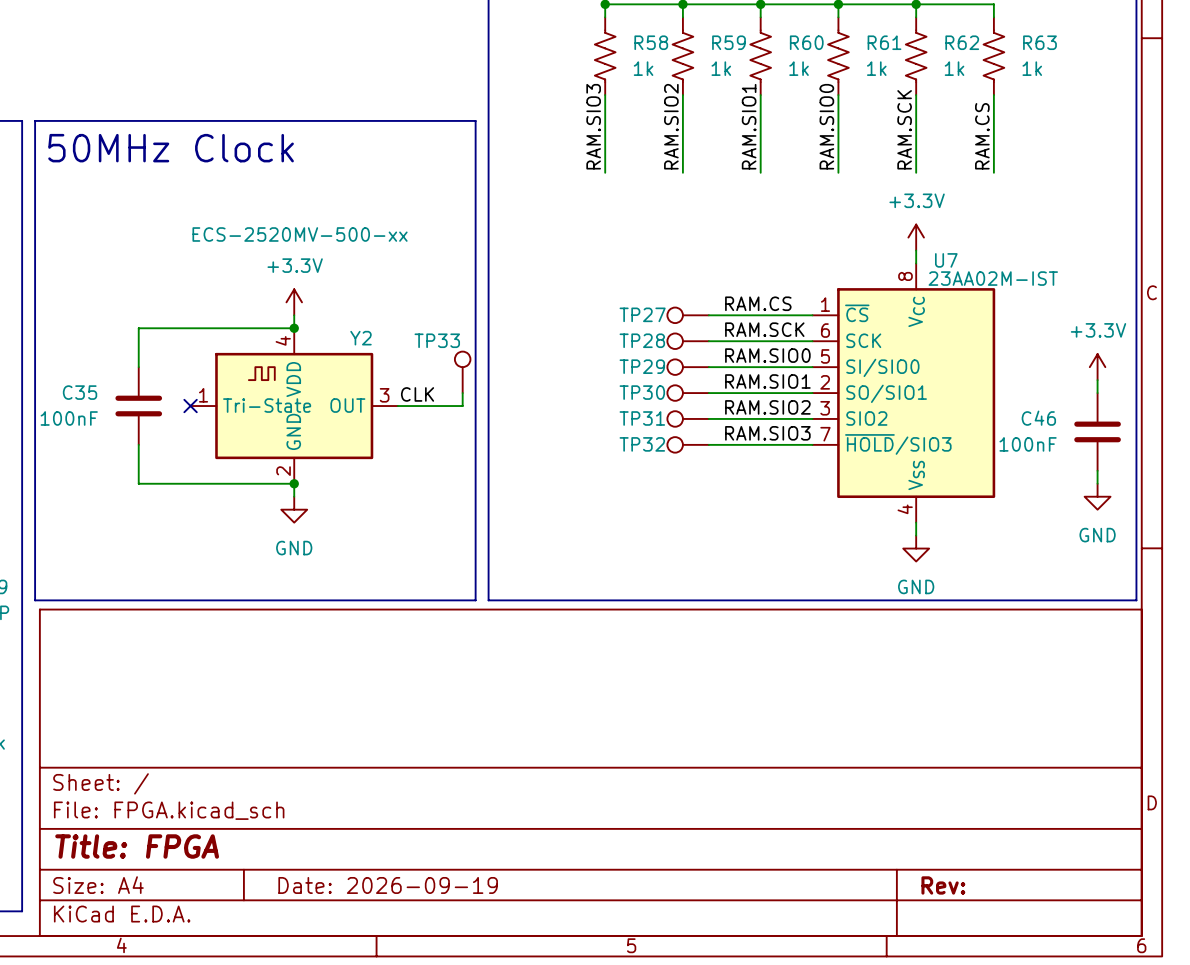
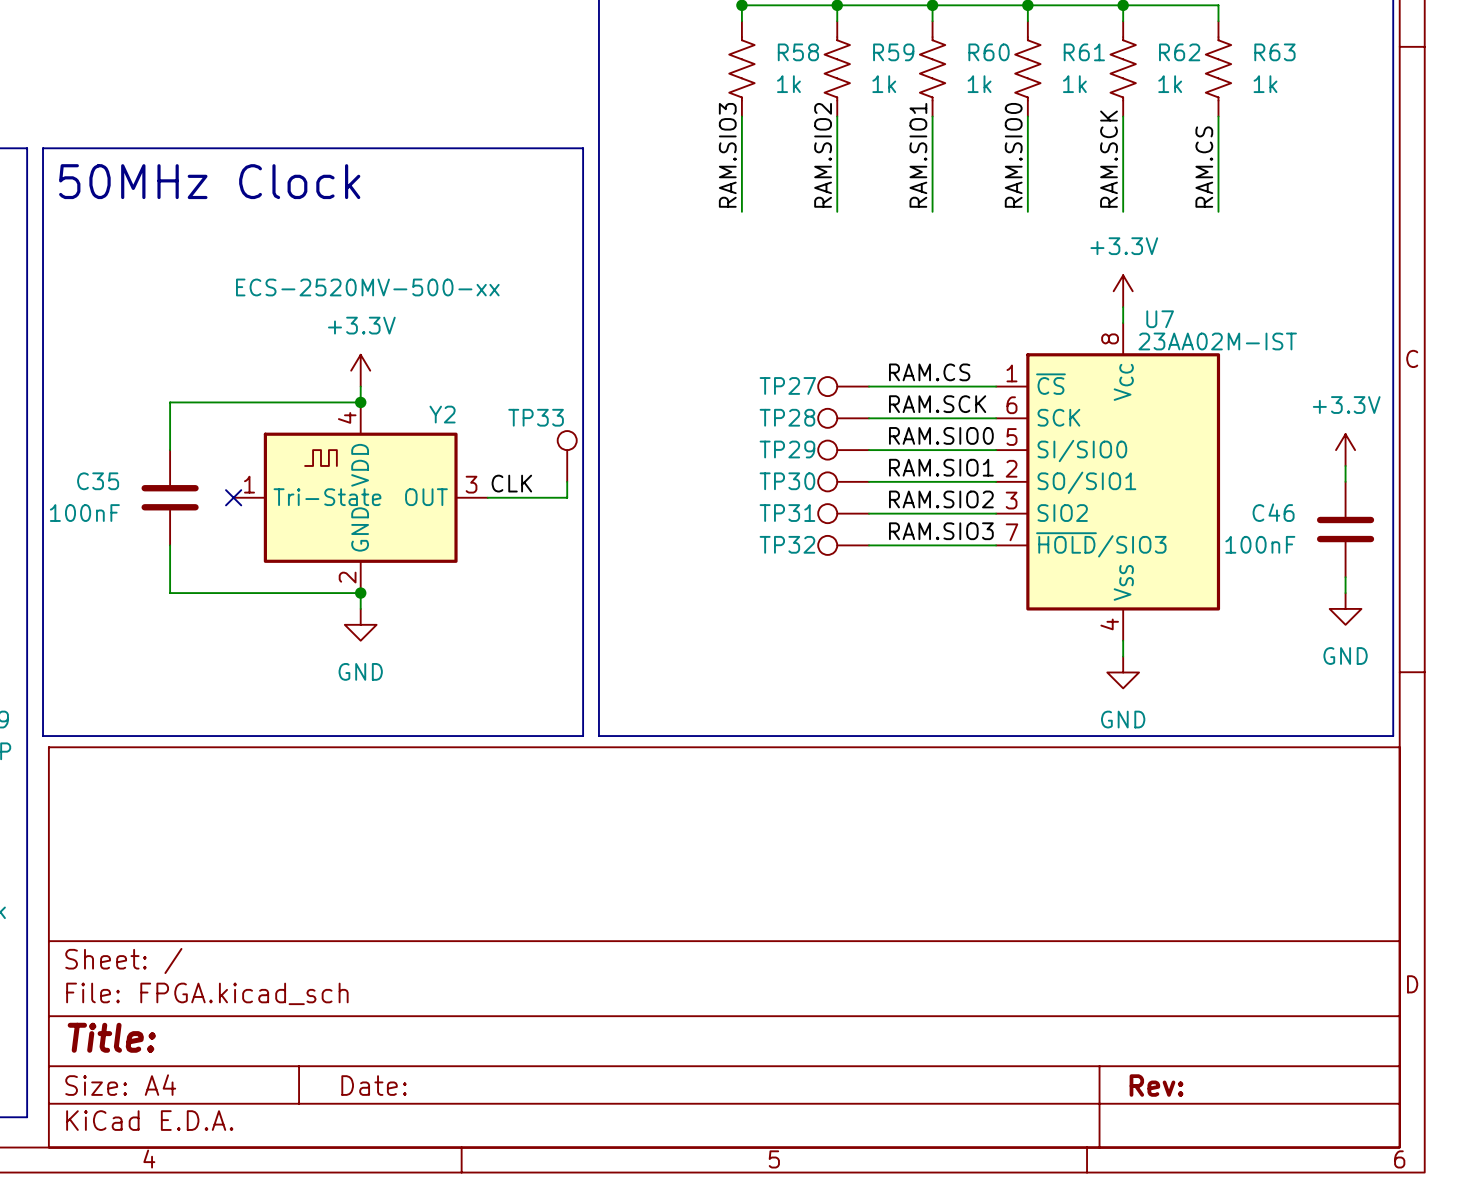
title block: Title: FPGA (137, 846) -> Title: (111, 1037)
title block: Date: 2026-09-19 (388, 885) -> Date: (374, 1085)

